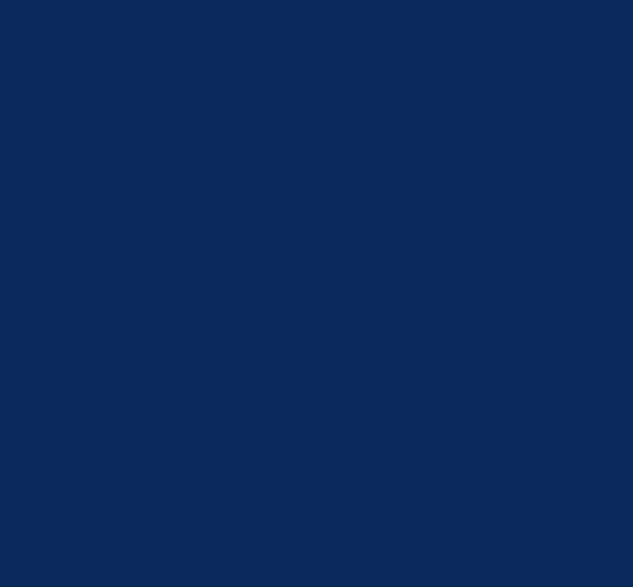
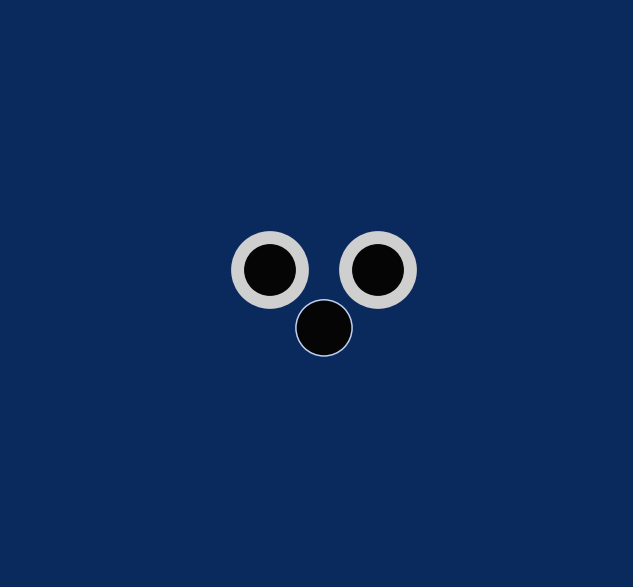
part: none -> (323, 293)

